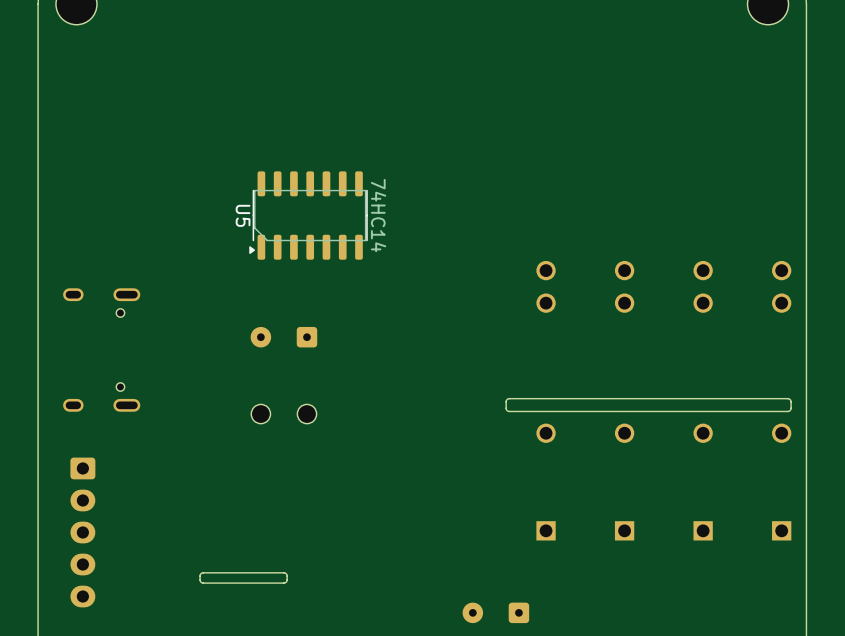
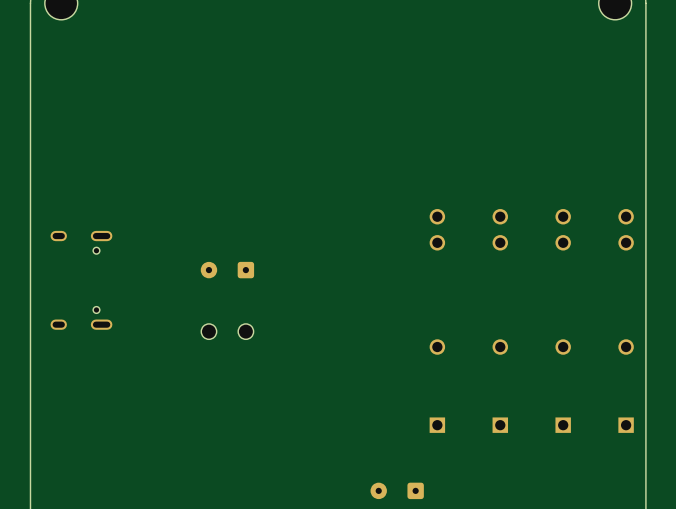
U5: 74HC14 (308, 215) -> none
board edge: (787, 398) (509, 398) (506, 400) (506, 408) (509, 411) (787, 411) (791, 408) (790, 400) (787, 398) -> none
part: (82, 532) -> none
board edge: (283, 572) (202, 572) (200, 574) (200, 580) (203, 583) (284, 583) (286, 580) (287, 576) (283, 572) -> none

